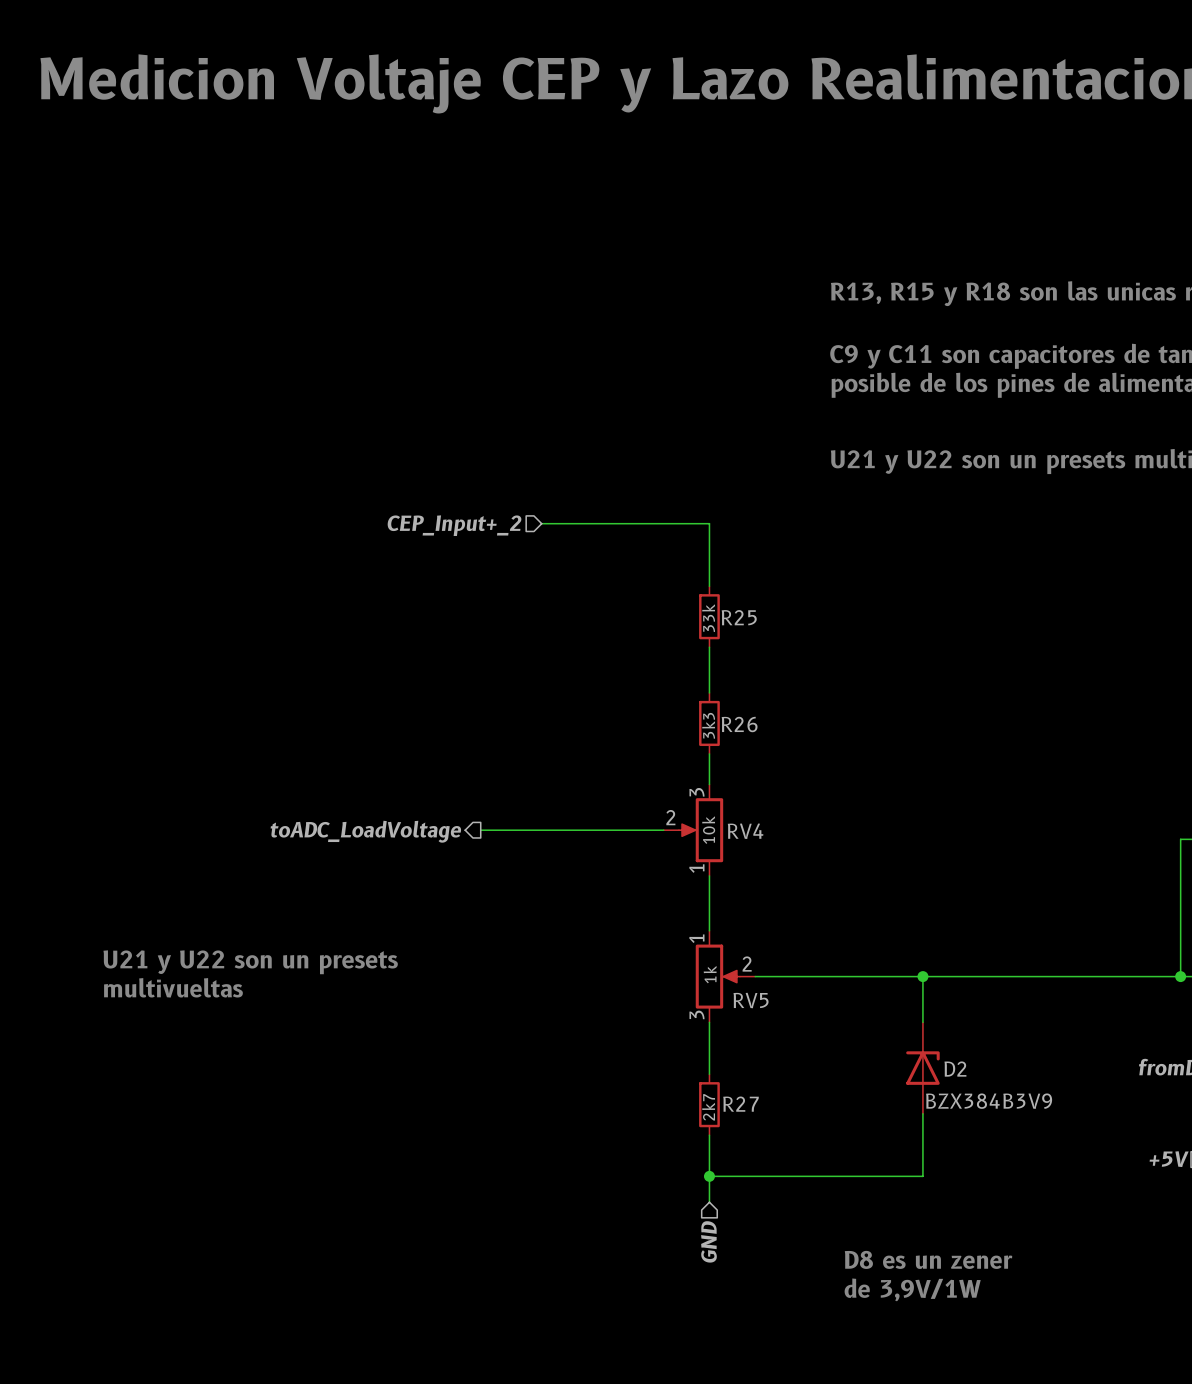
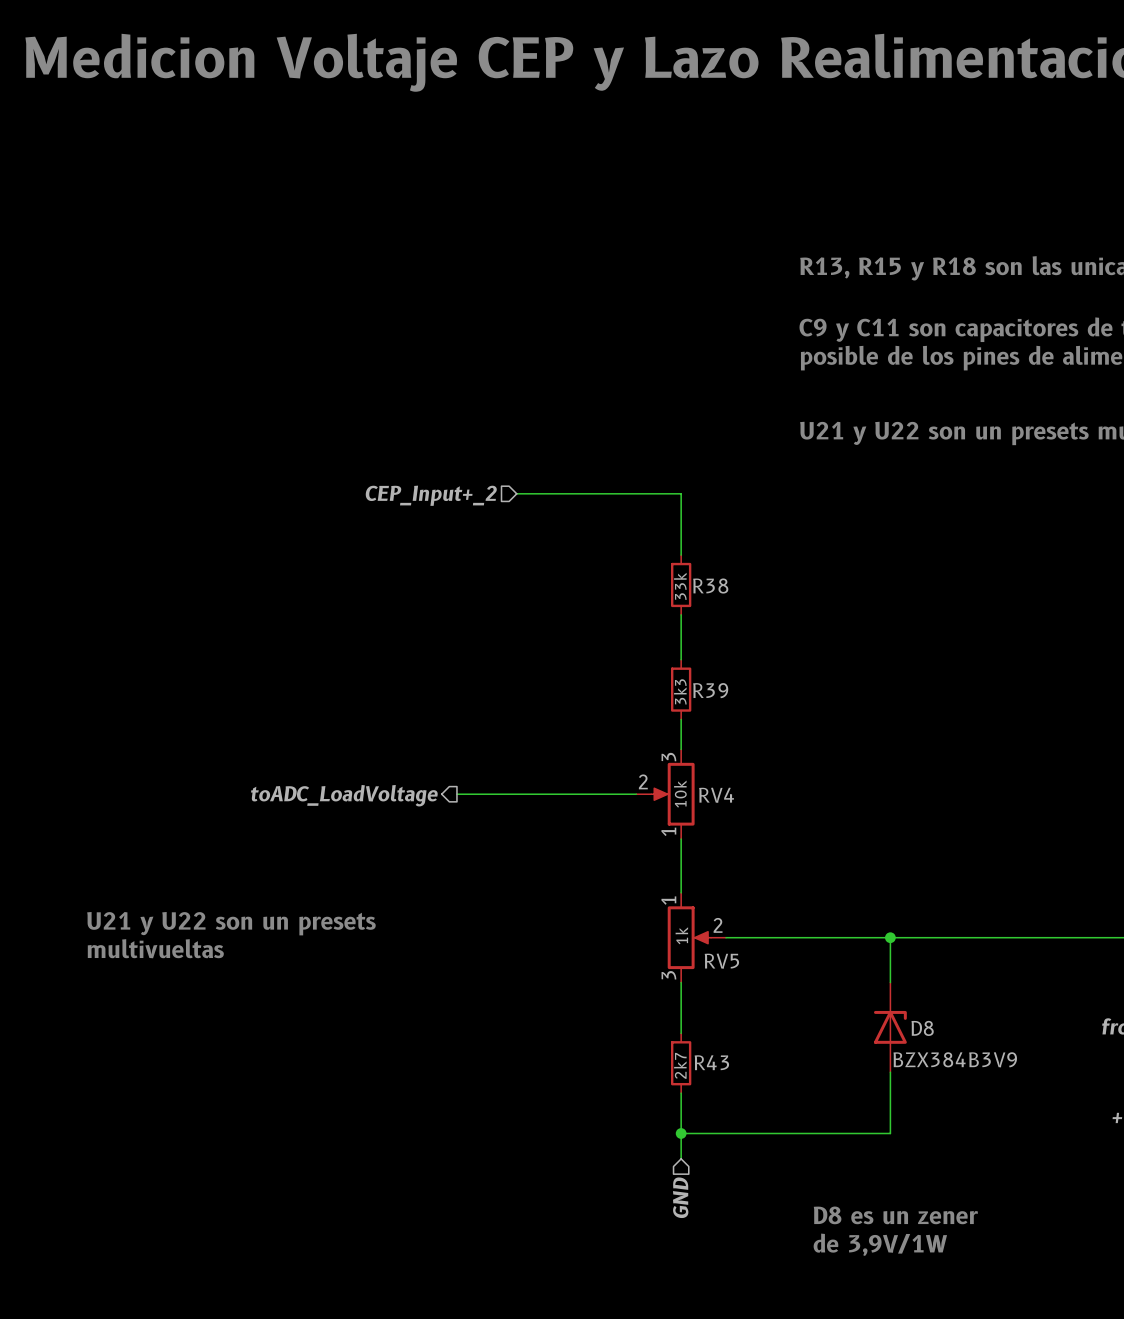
R25 name: R25 (739, 617) -> R38 (710, 586)
R26 name: R26 (739, 724) -> R39 (710, 690)
D2 name: D2 (955, 1069) -> D8 (922, 1028)
R27 name: R27 (741, 1104) -> R43 (711, 1062)

